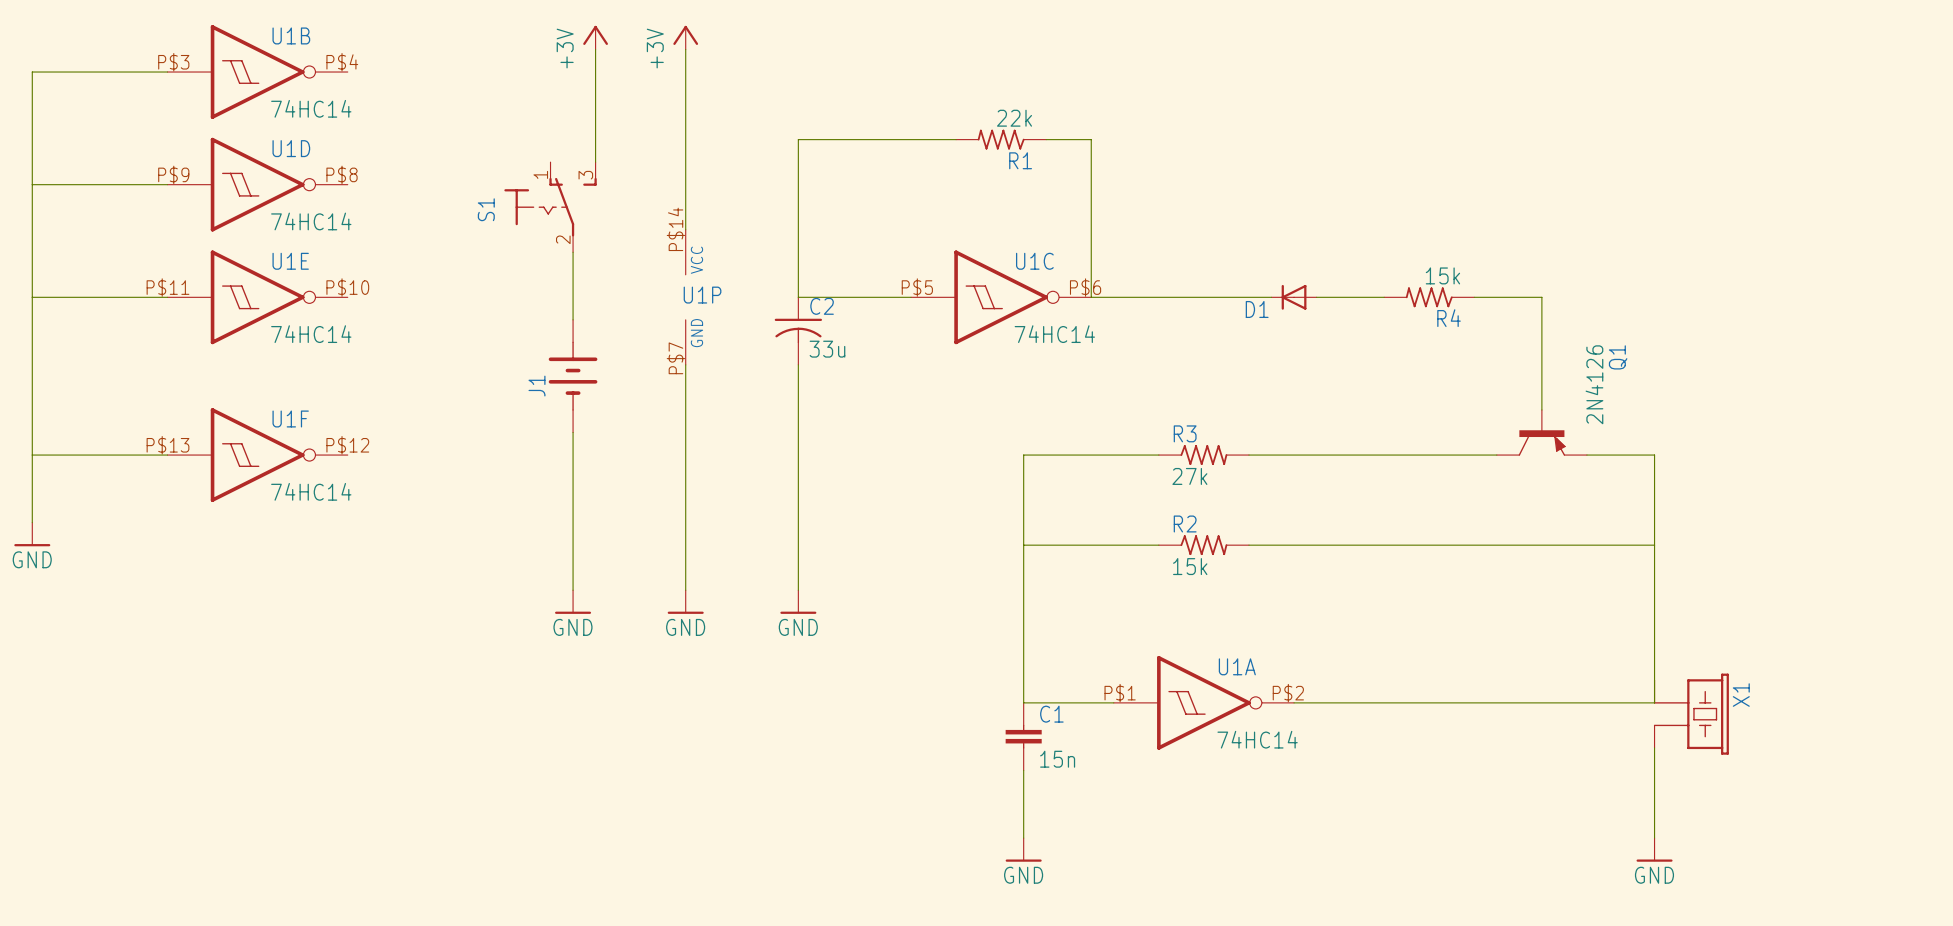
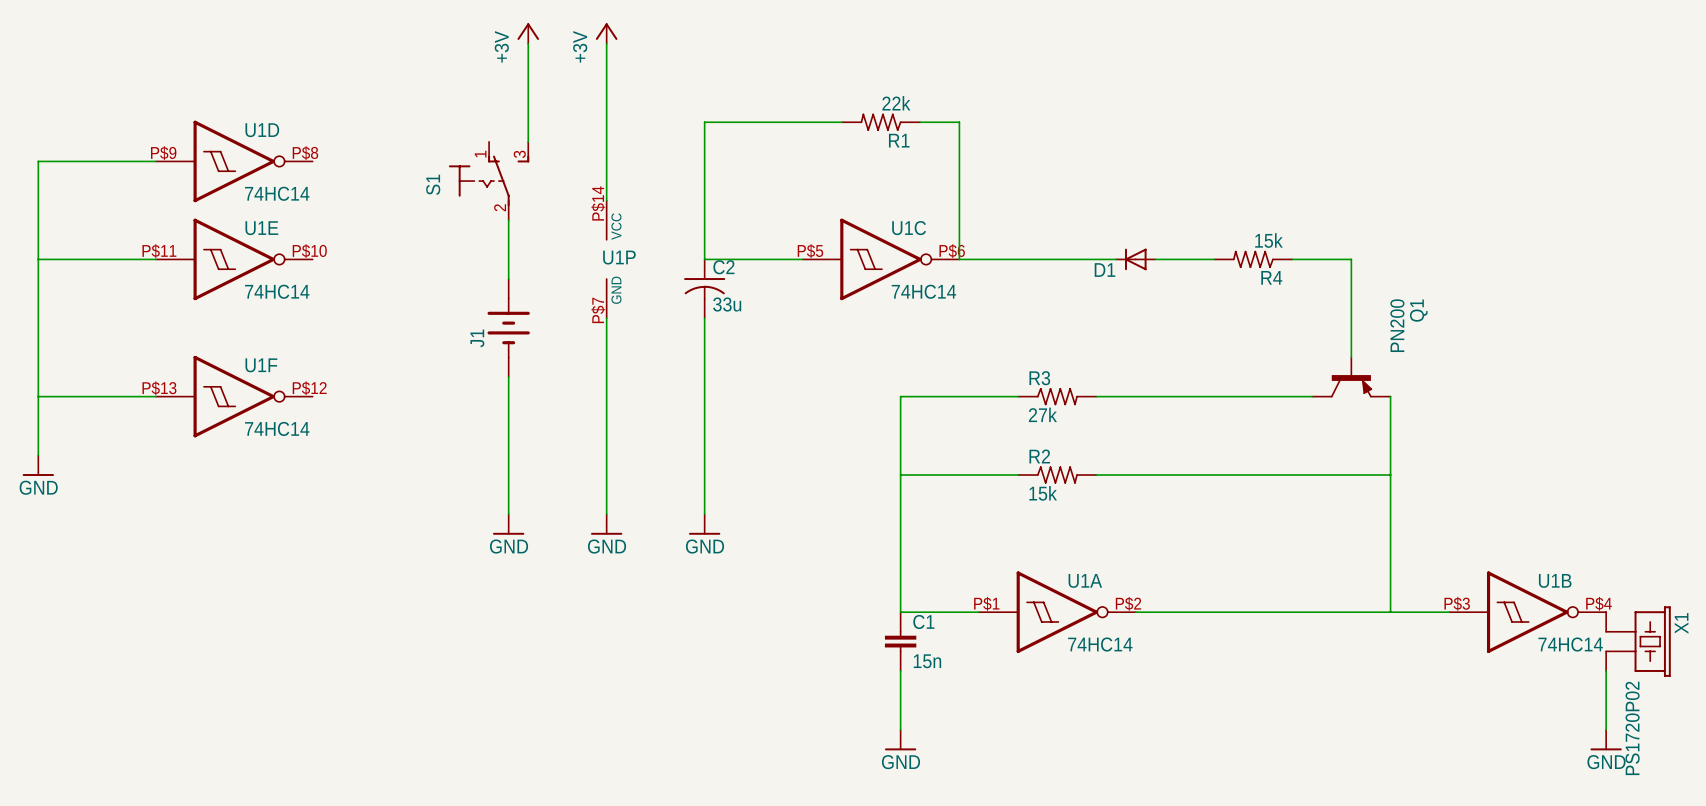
wire: (167, 72) (32, 72) (32, 184) -> none
U1B position: (257, 72) -> (1527, 612)
Q1 value: 2N4126 (1594, 384) -> PN200 (1397, 325)
wire: (1586, 455) (1654, 455) (1654, 702) -> (1390, 396) (1390, 612)
wire: (1586, 545) (1654, 545) -> none
X1 position: (1691, 714) -> (1638, 641)
wire: (1654, 747) (1654, 838) -> none
wire: none -> (1606, 670) (1606, 729)
X1 value: none -> PS1720P02 (1632, 728)
power symbol position: GND (1654, 849) -> GND (1606, 740)

